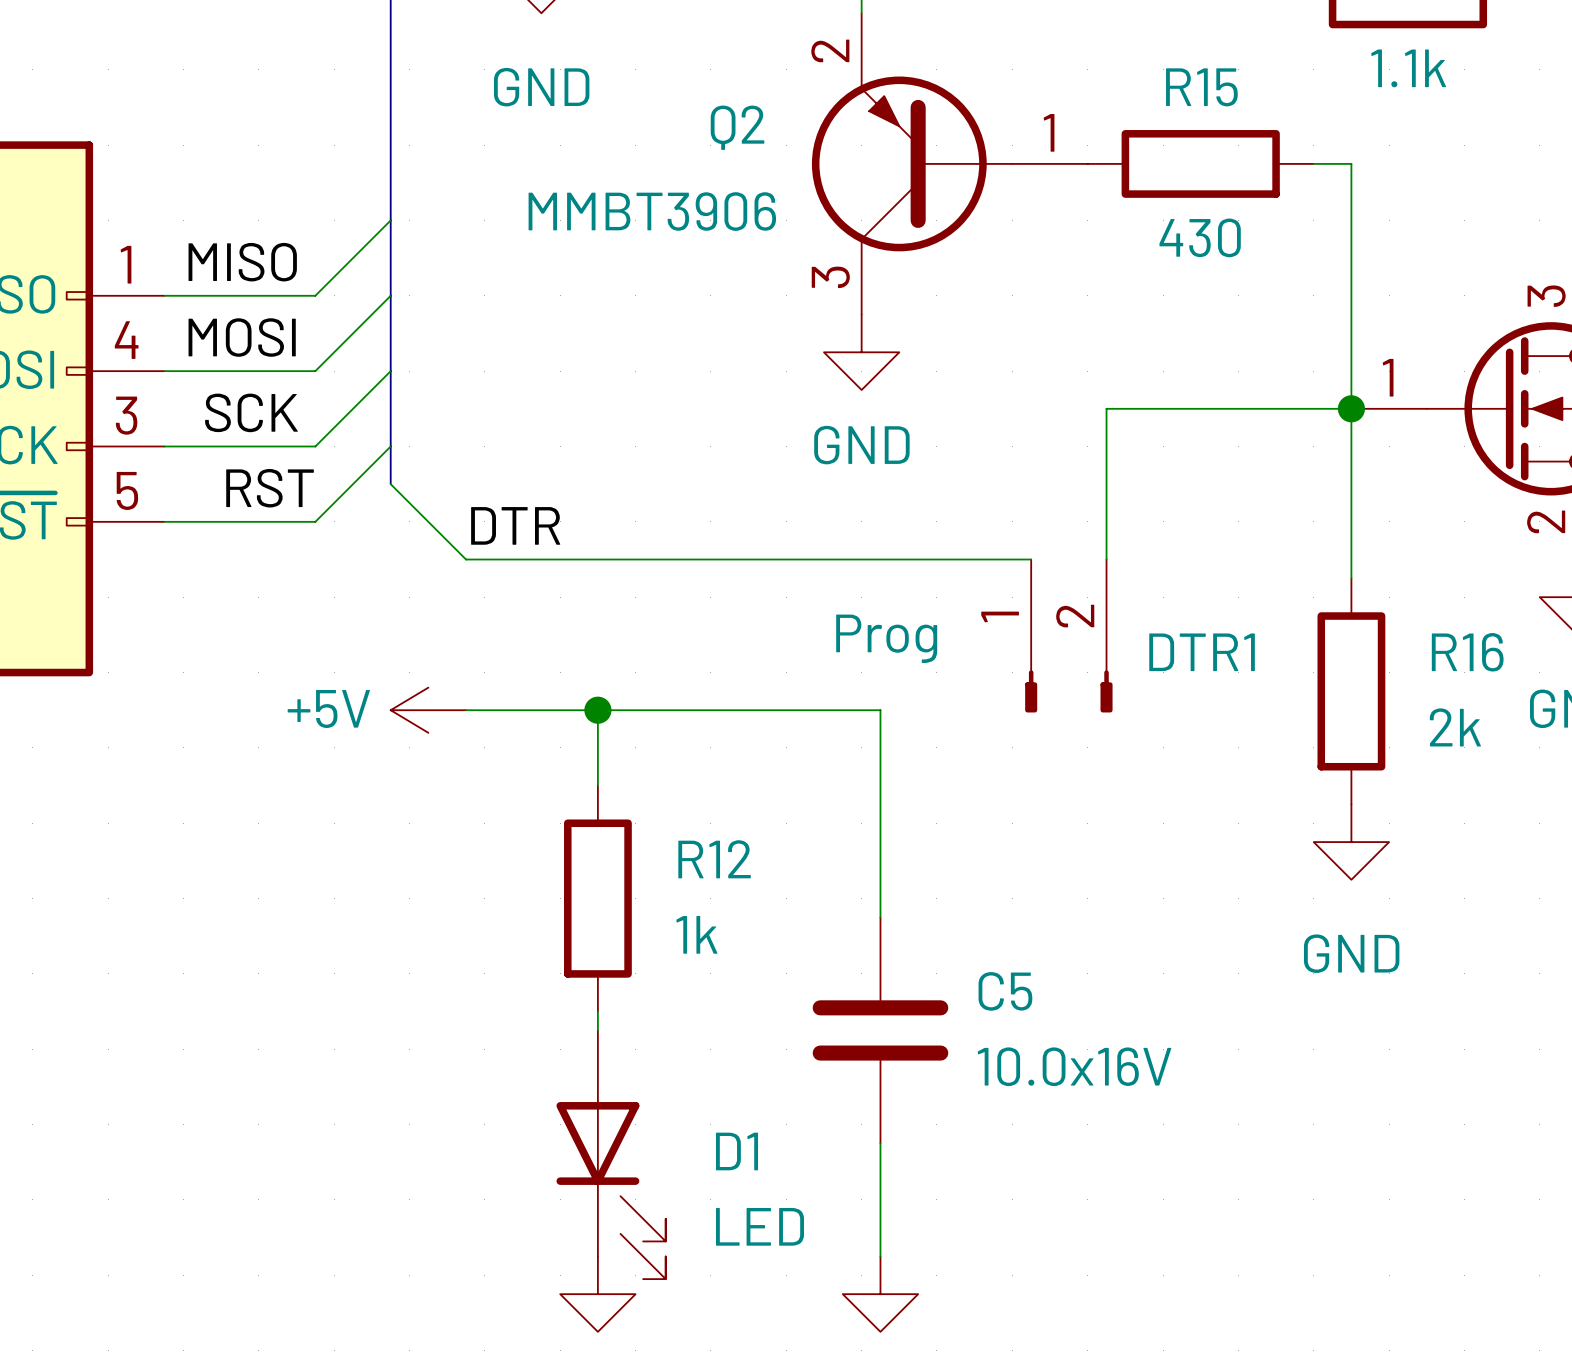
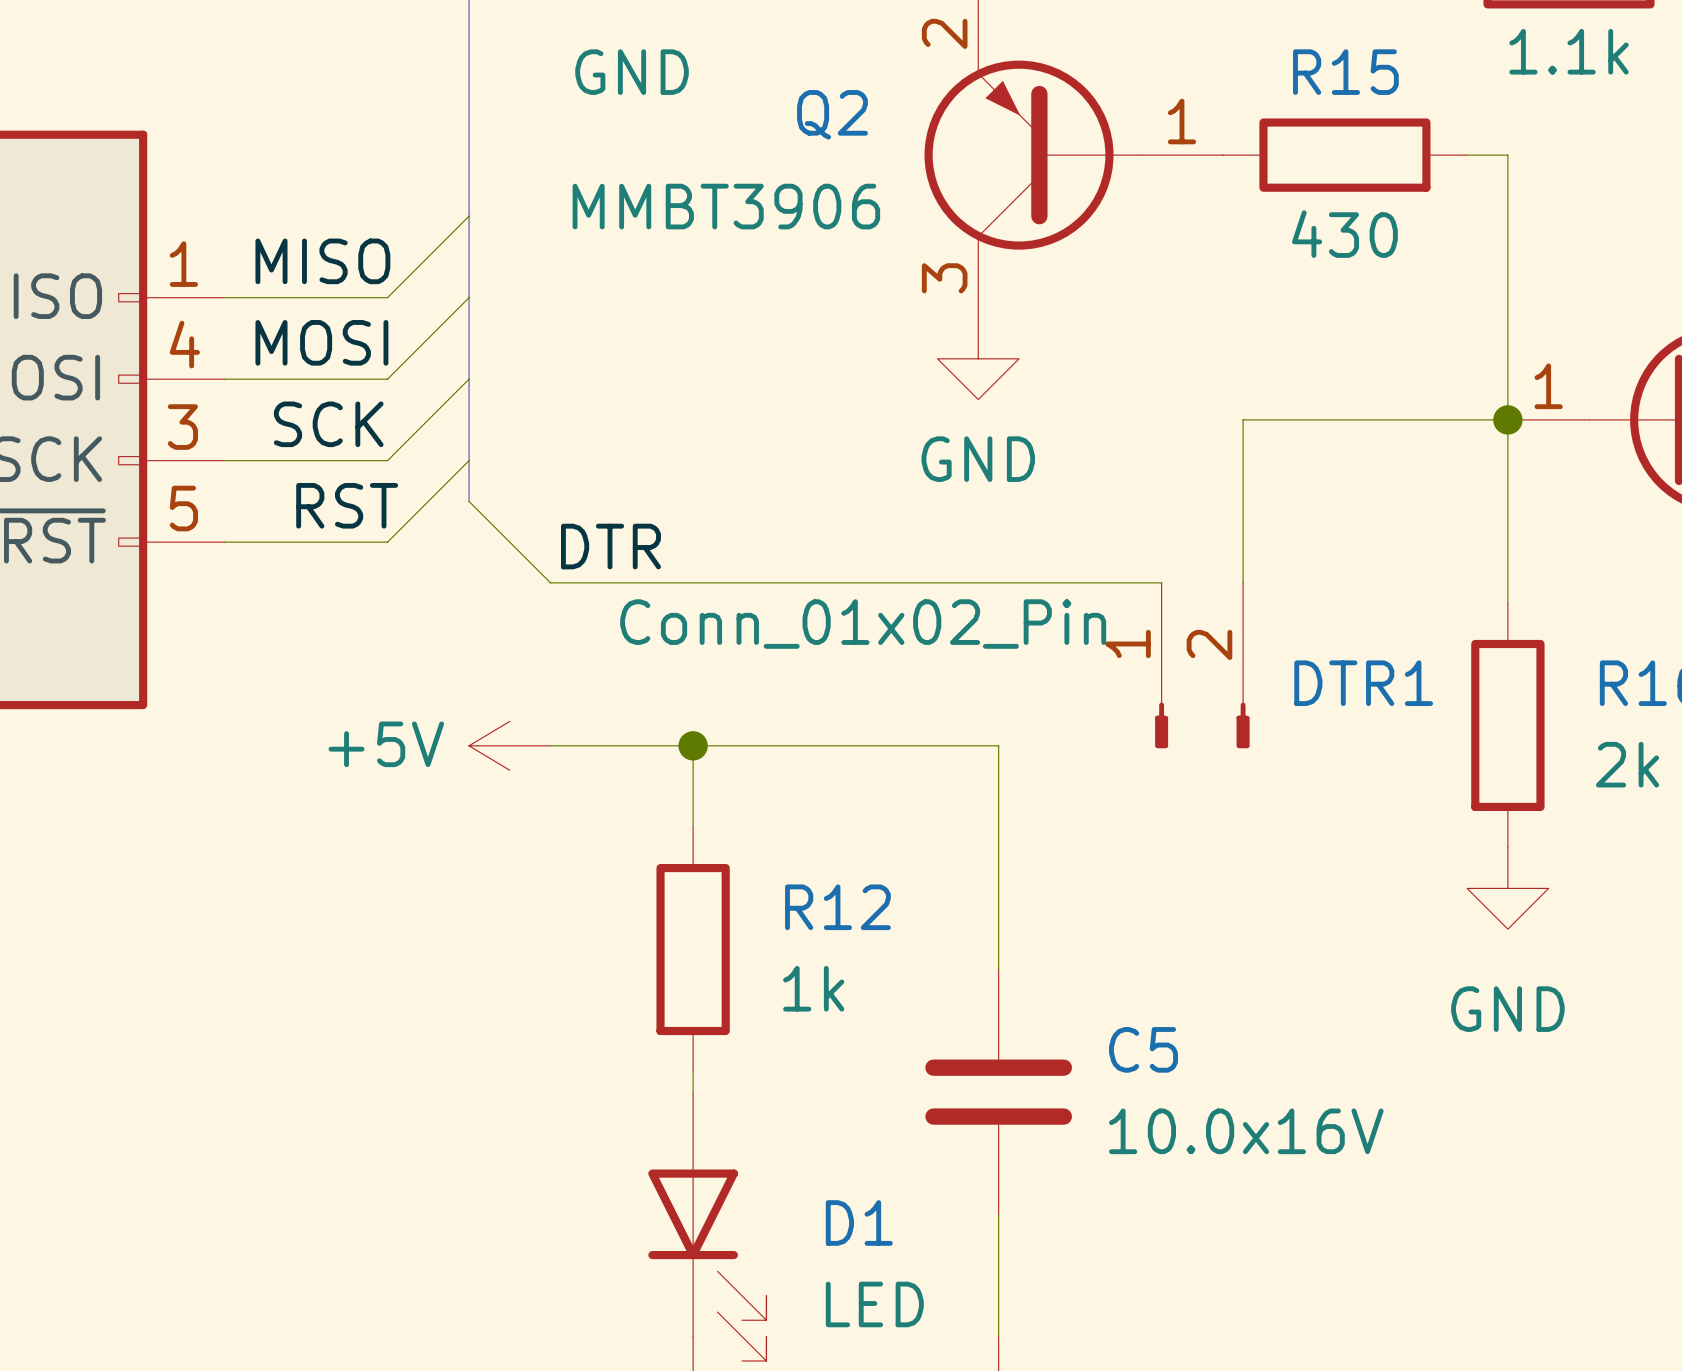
DTR1 value: Prog (886, 638) -> Conn_01x02_Pin (863, 624)

